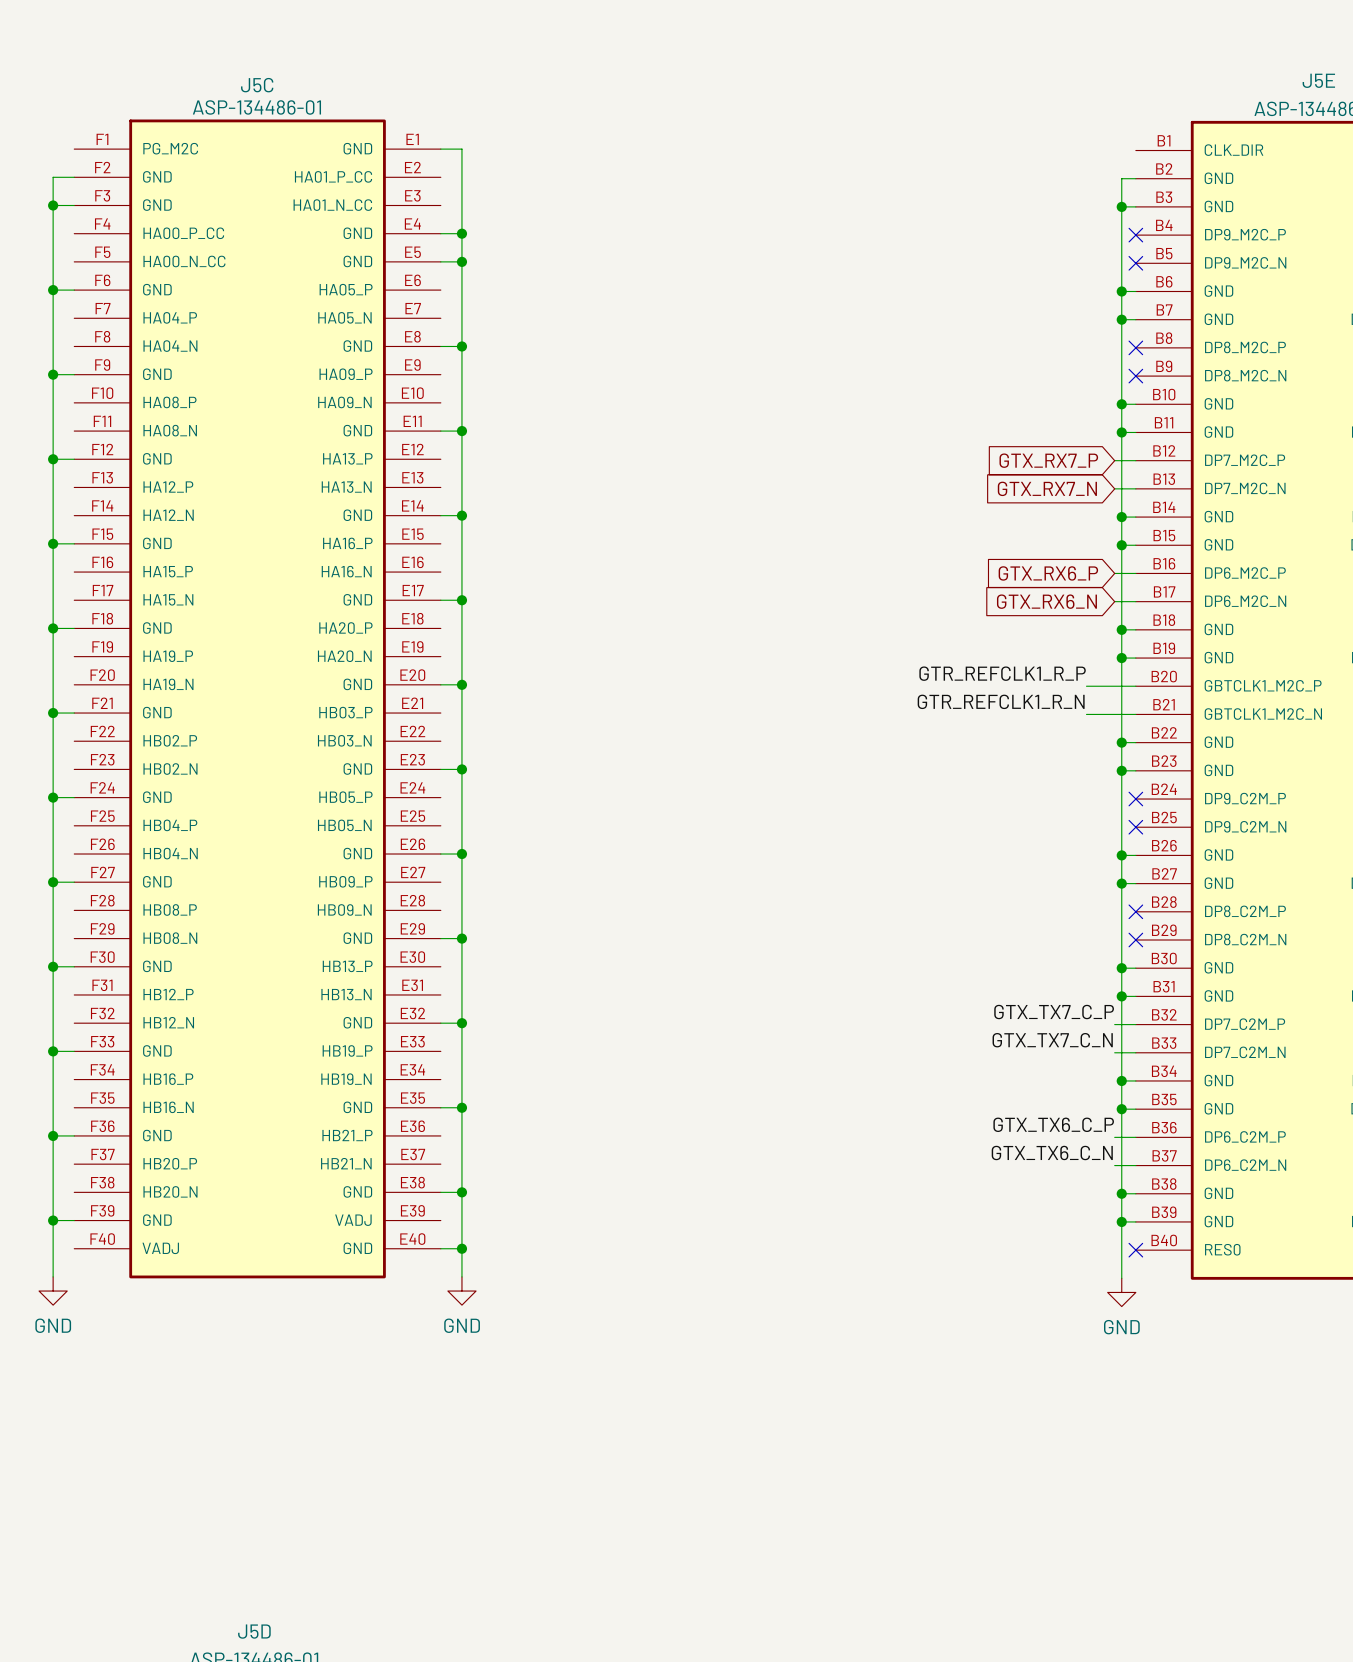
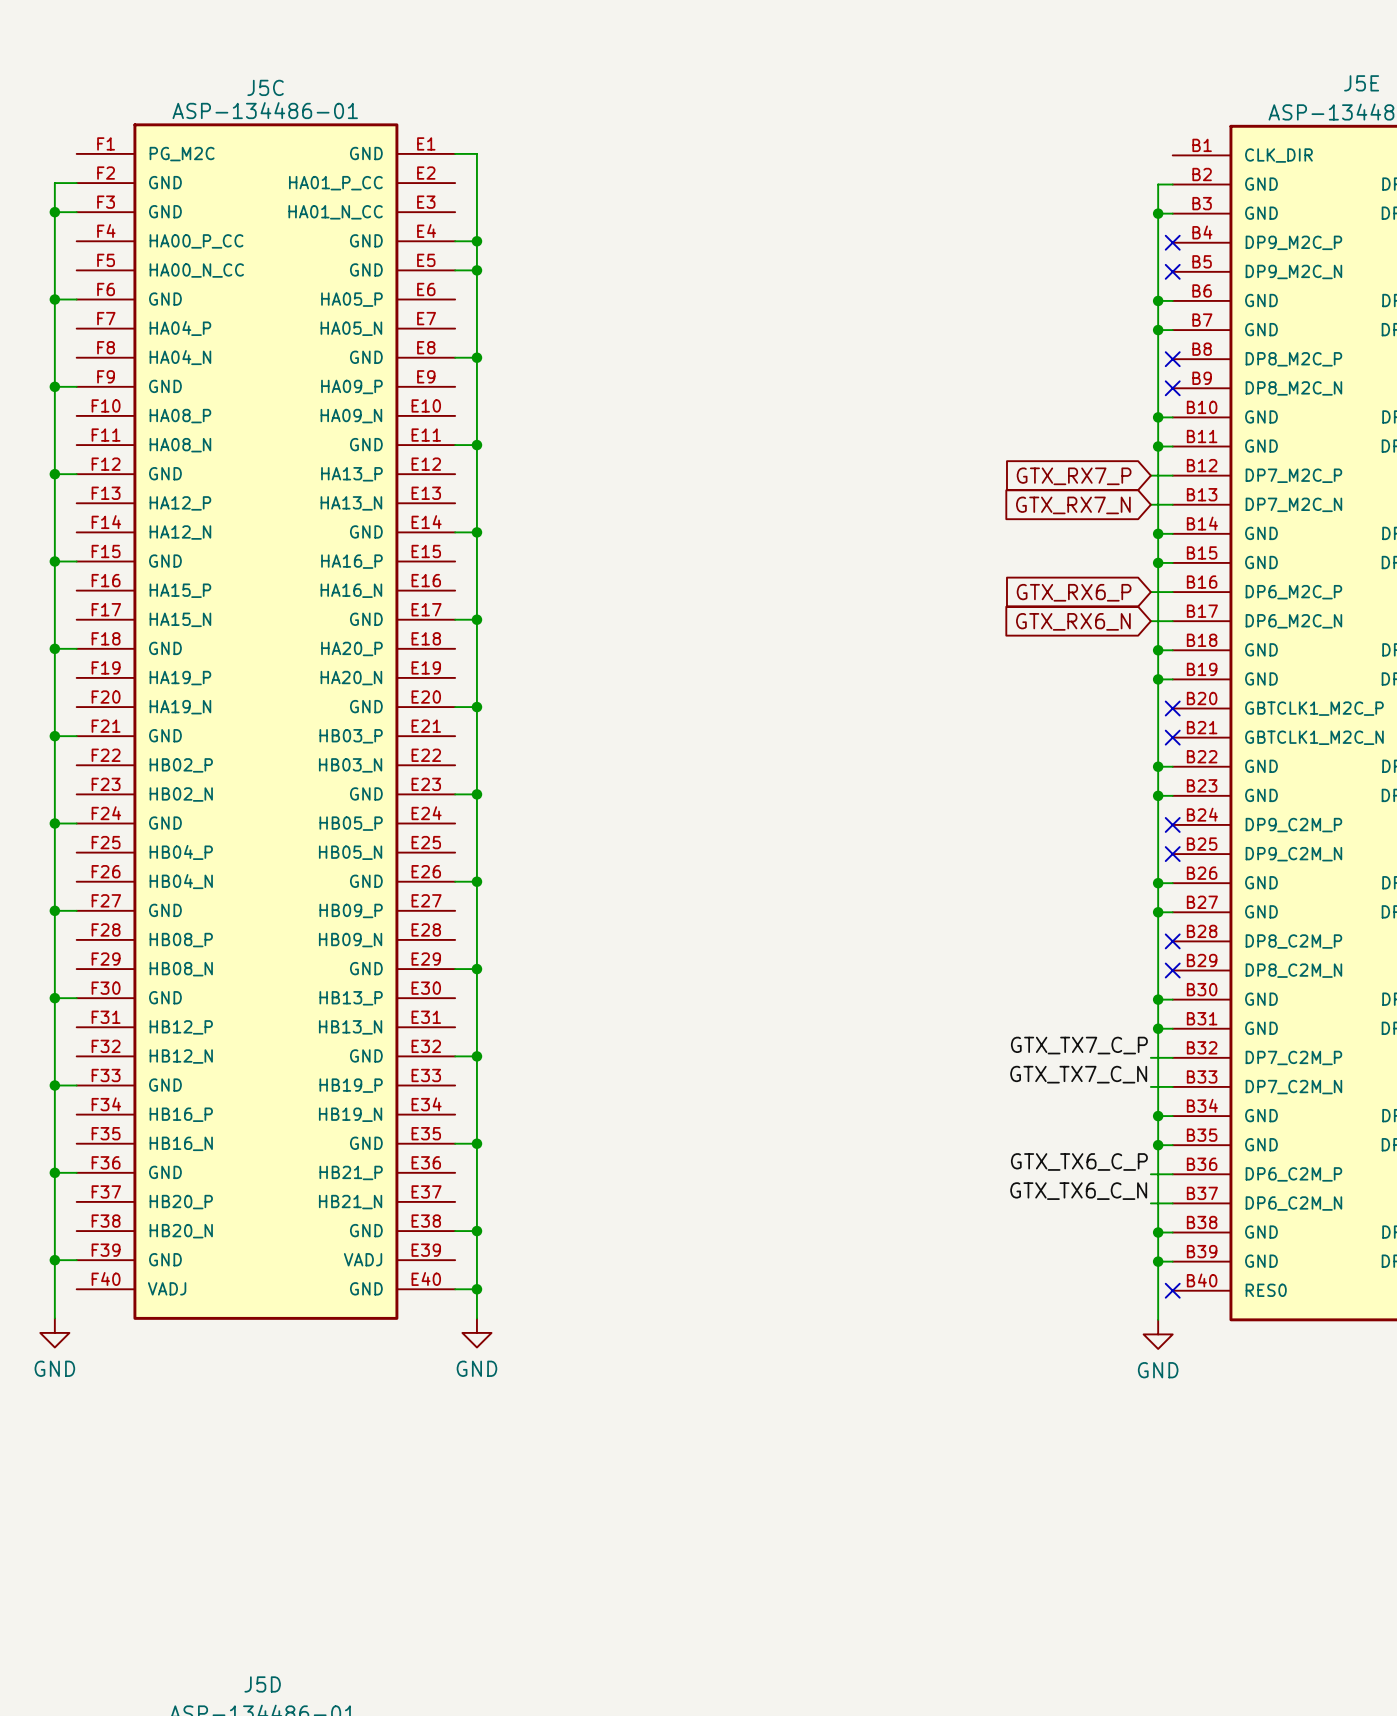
label: GTR_REFCLK1_R_P (1002, 673) -> none
wire: (1086, 686) (1135, 686) -> none
no-connect mark: none -> (1172, 708)
label: GTR_REFCLK1_R_N (1001, 701) -> none
wire: (1086, 714) (1135, 714) -> none
no-connect mark: none -> (1172, 737)

